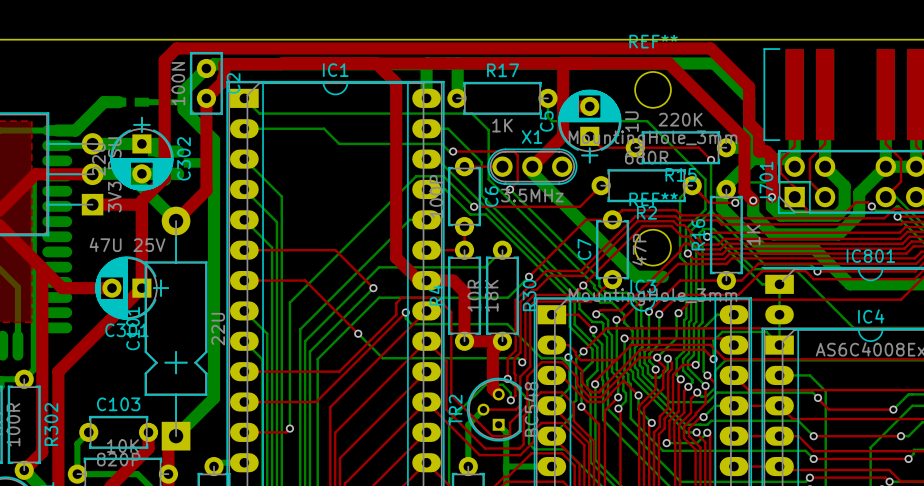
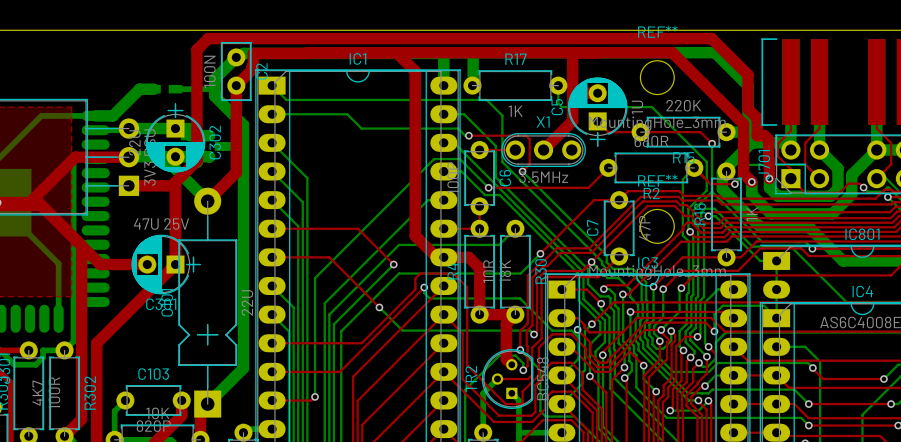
bottom track: (532, 166) (532, 172) (636, 276) (662, 276) -> none

